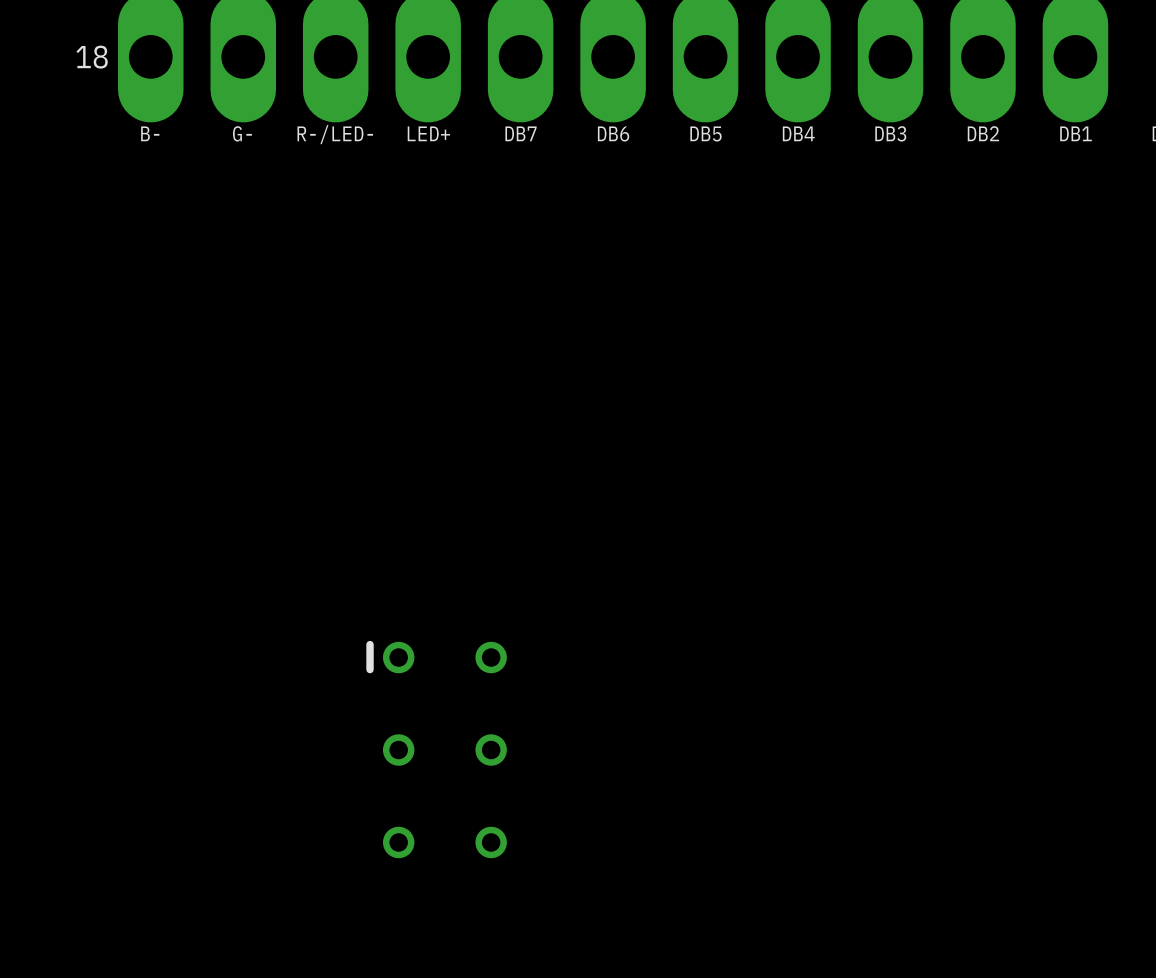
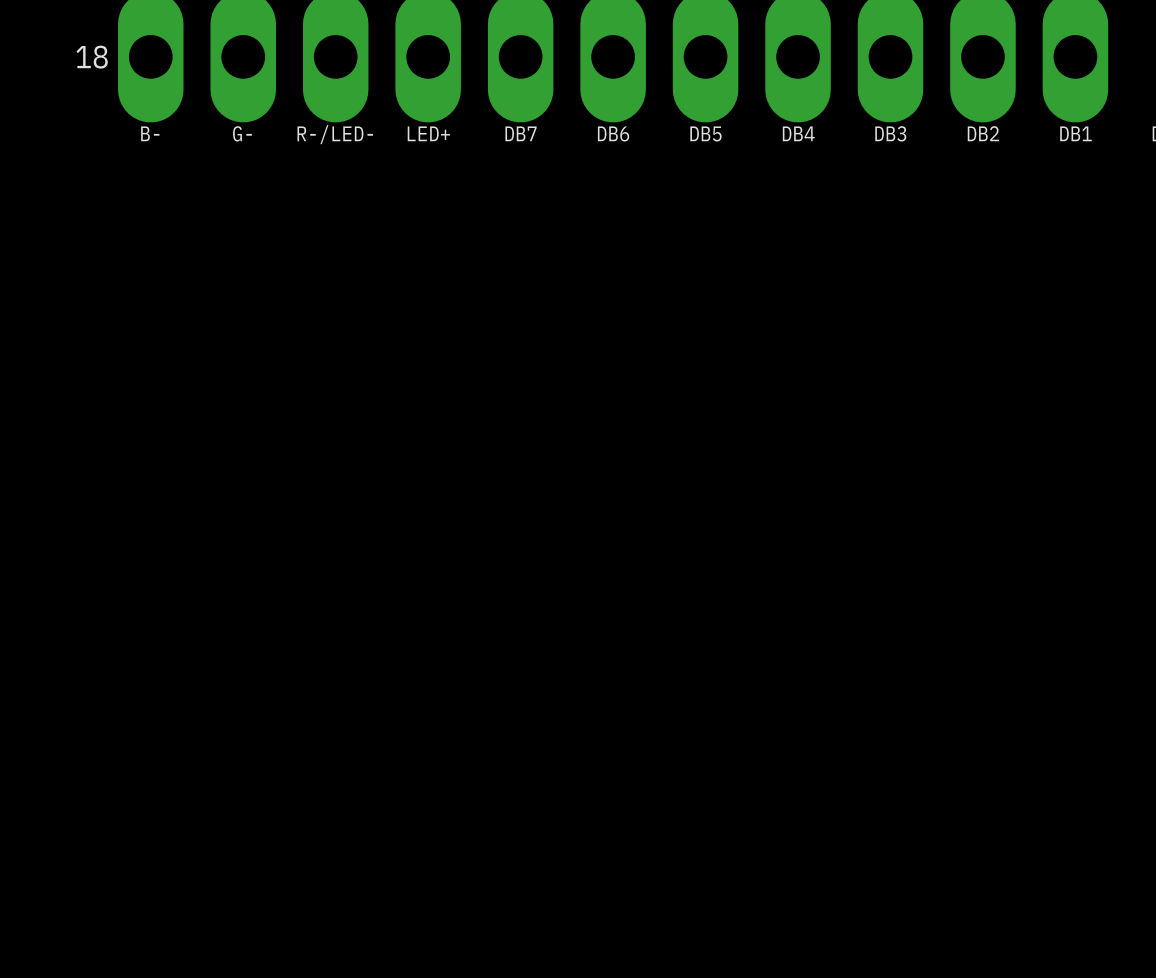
part: (436, 749) -> none

